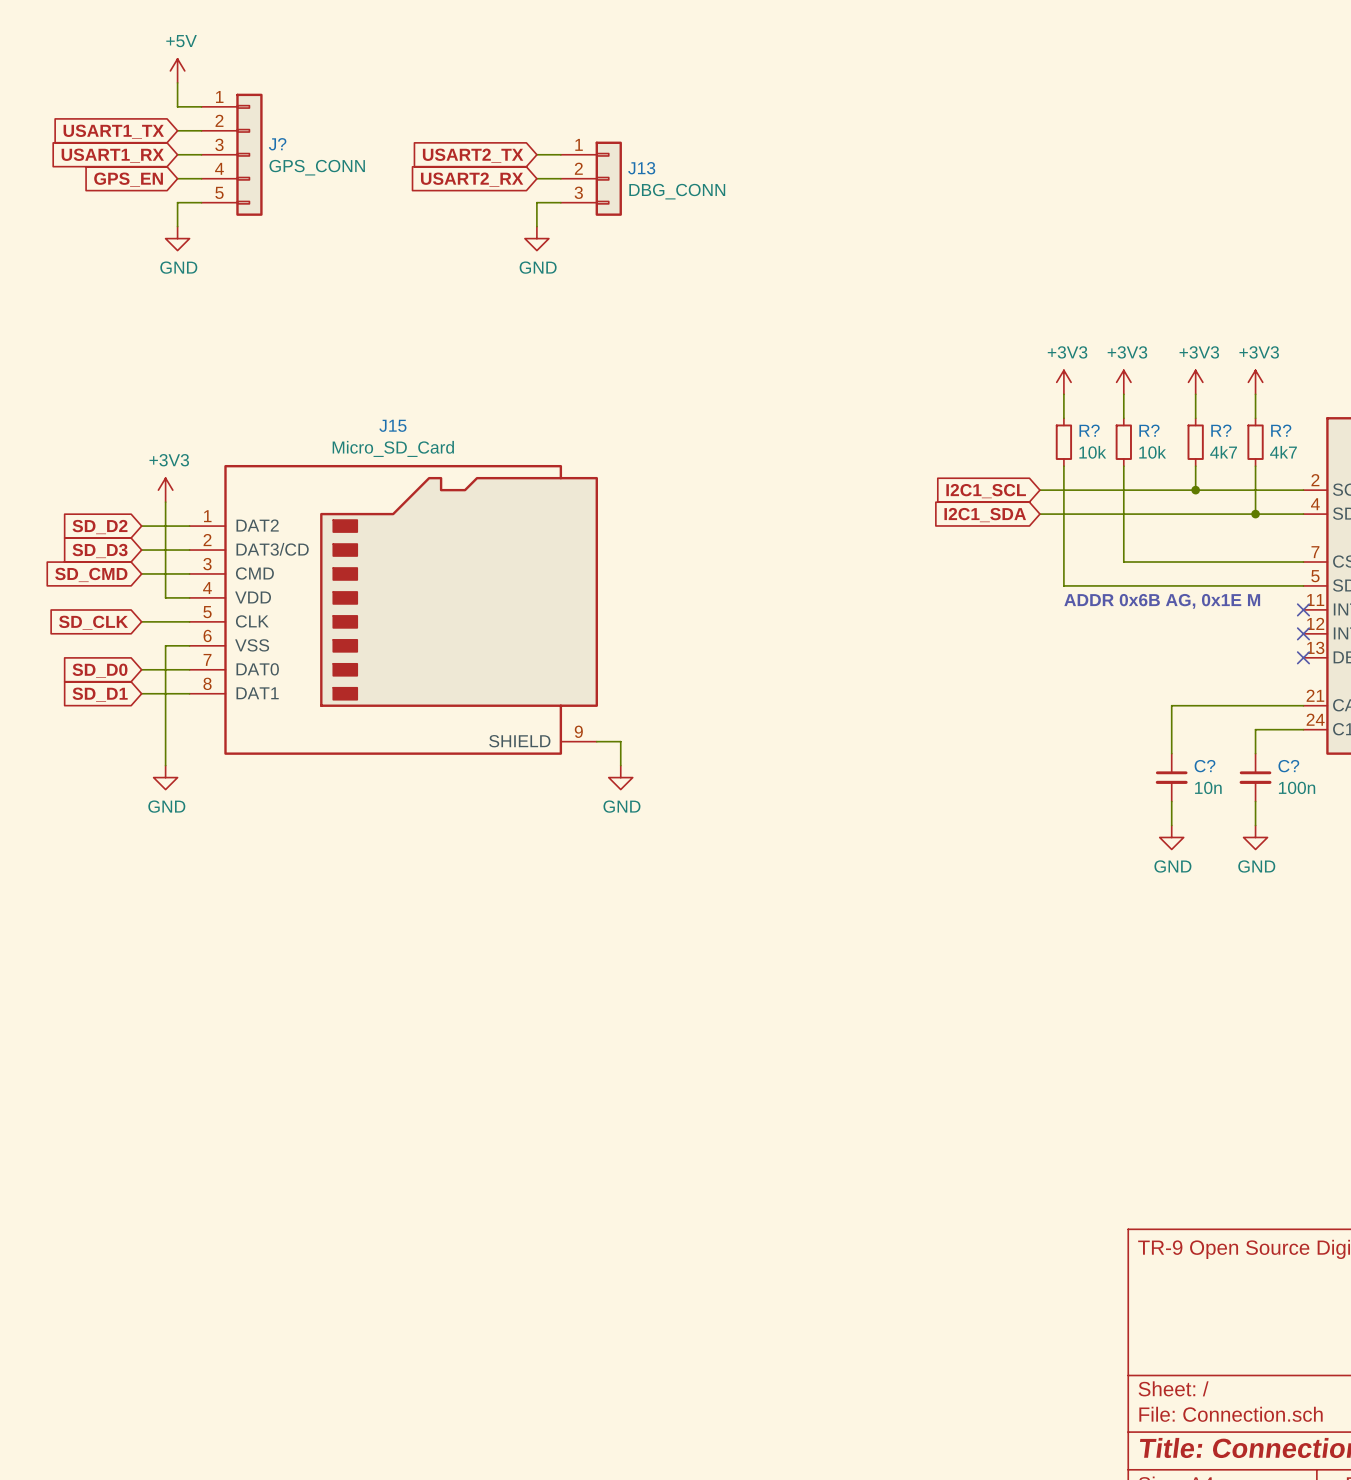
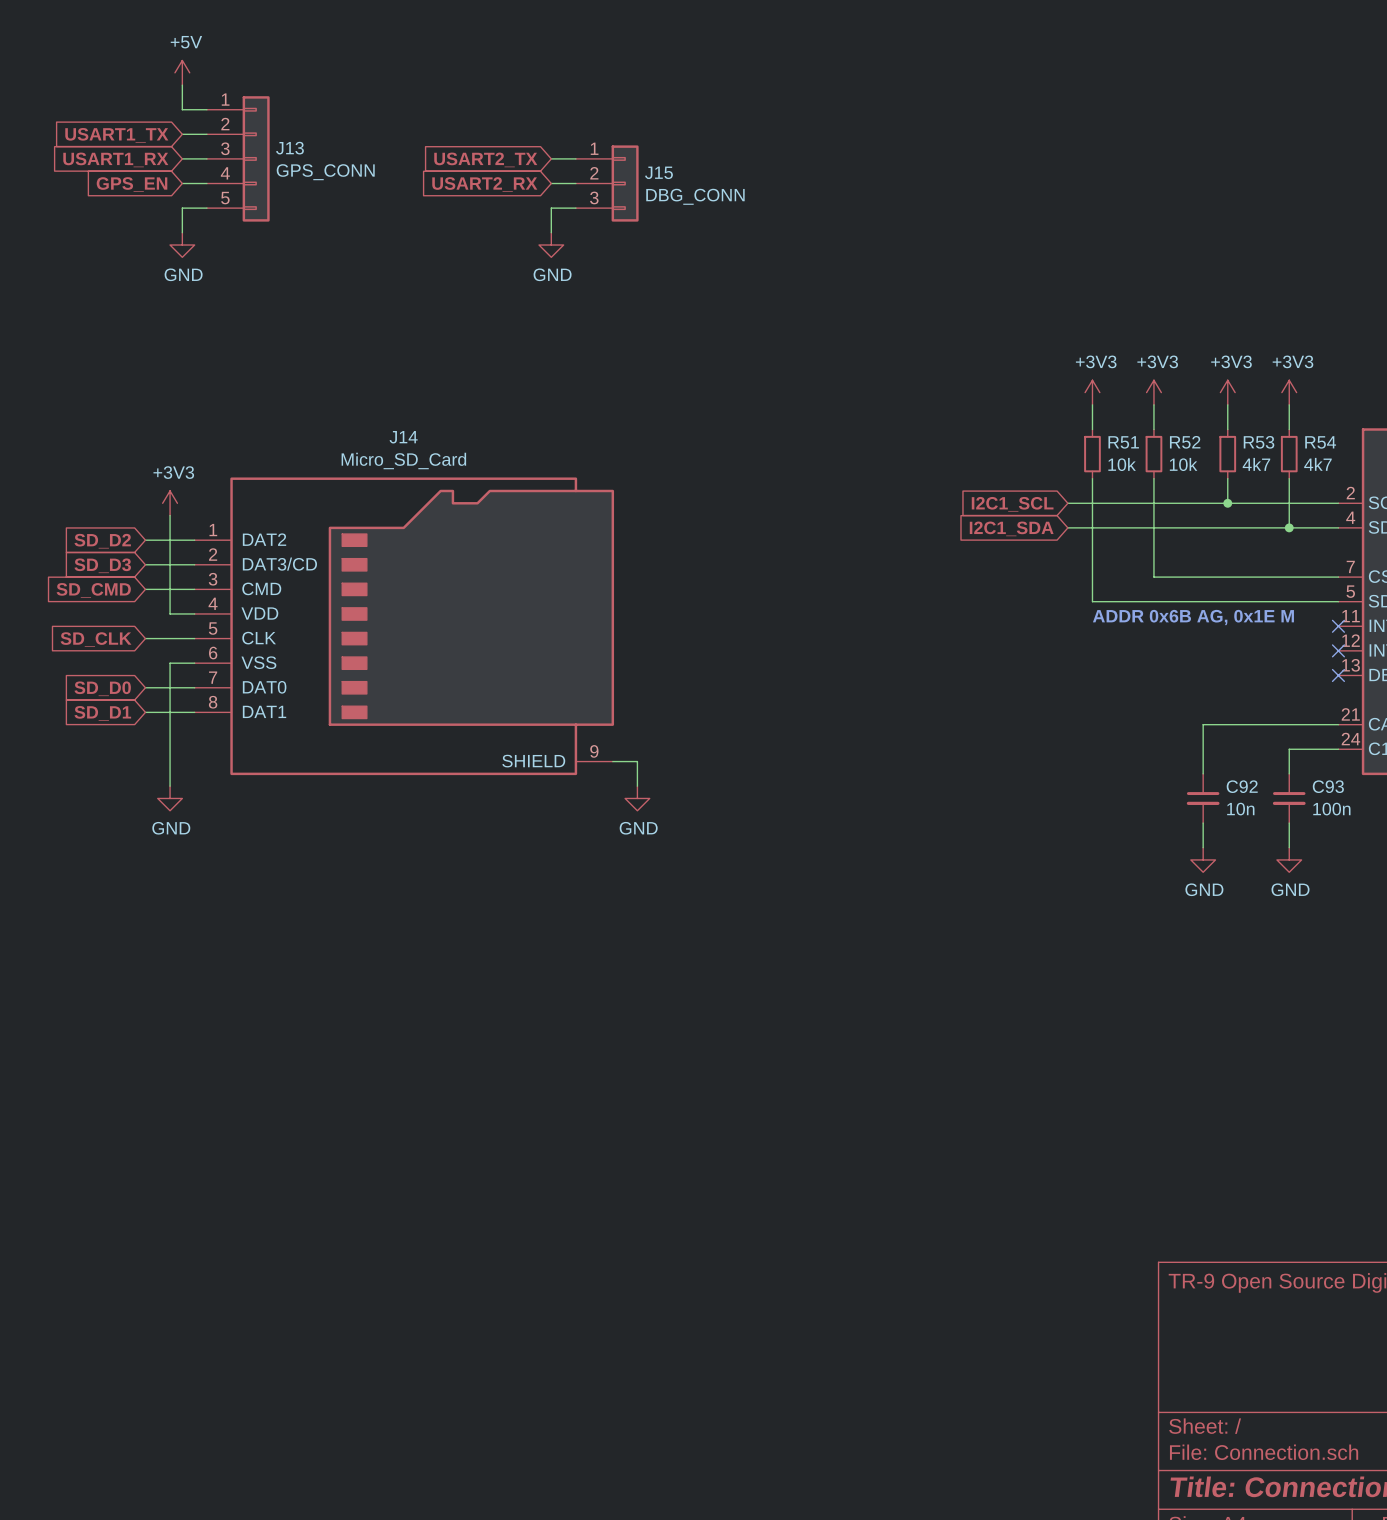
J? name: J? (277, 144) -> J13 (289, 148)
J13 name: J13 (641, 168) -> J15 (658, 172)
J15 name: J15 (392, 425) -> J14 (403, 437)
R? name: R? (1089, 430) -> R51 (1123, 442)
R? name: R? (1149, 430) -> R52 (1185, 442)
R? name: R? (1221, 430) -> R53 (1259, 442)
R? name: R? (1281, 430) -> R54 (1320, 442)
C? name: C? (1204, 766) -> C92 (1242, 786)
C? name: C? (1288, 766) -> C93 (1328, 786)

